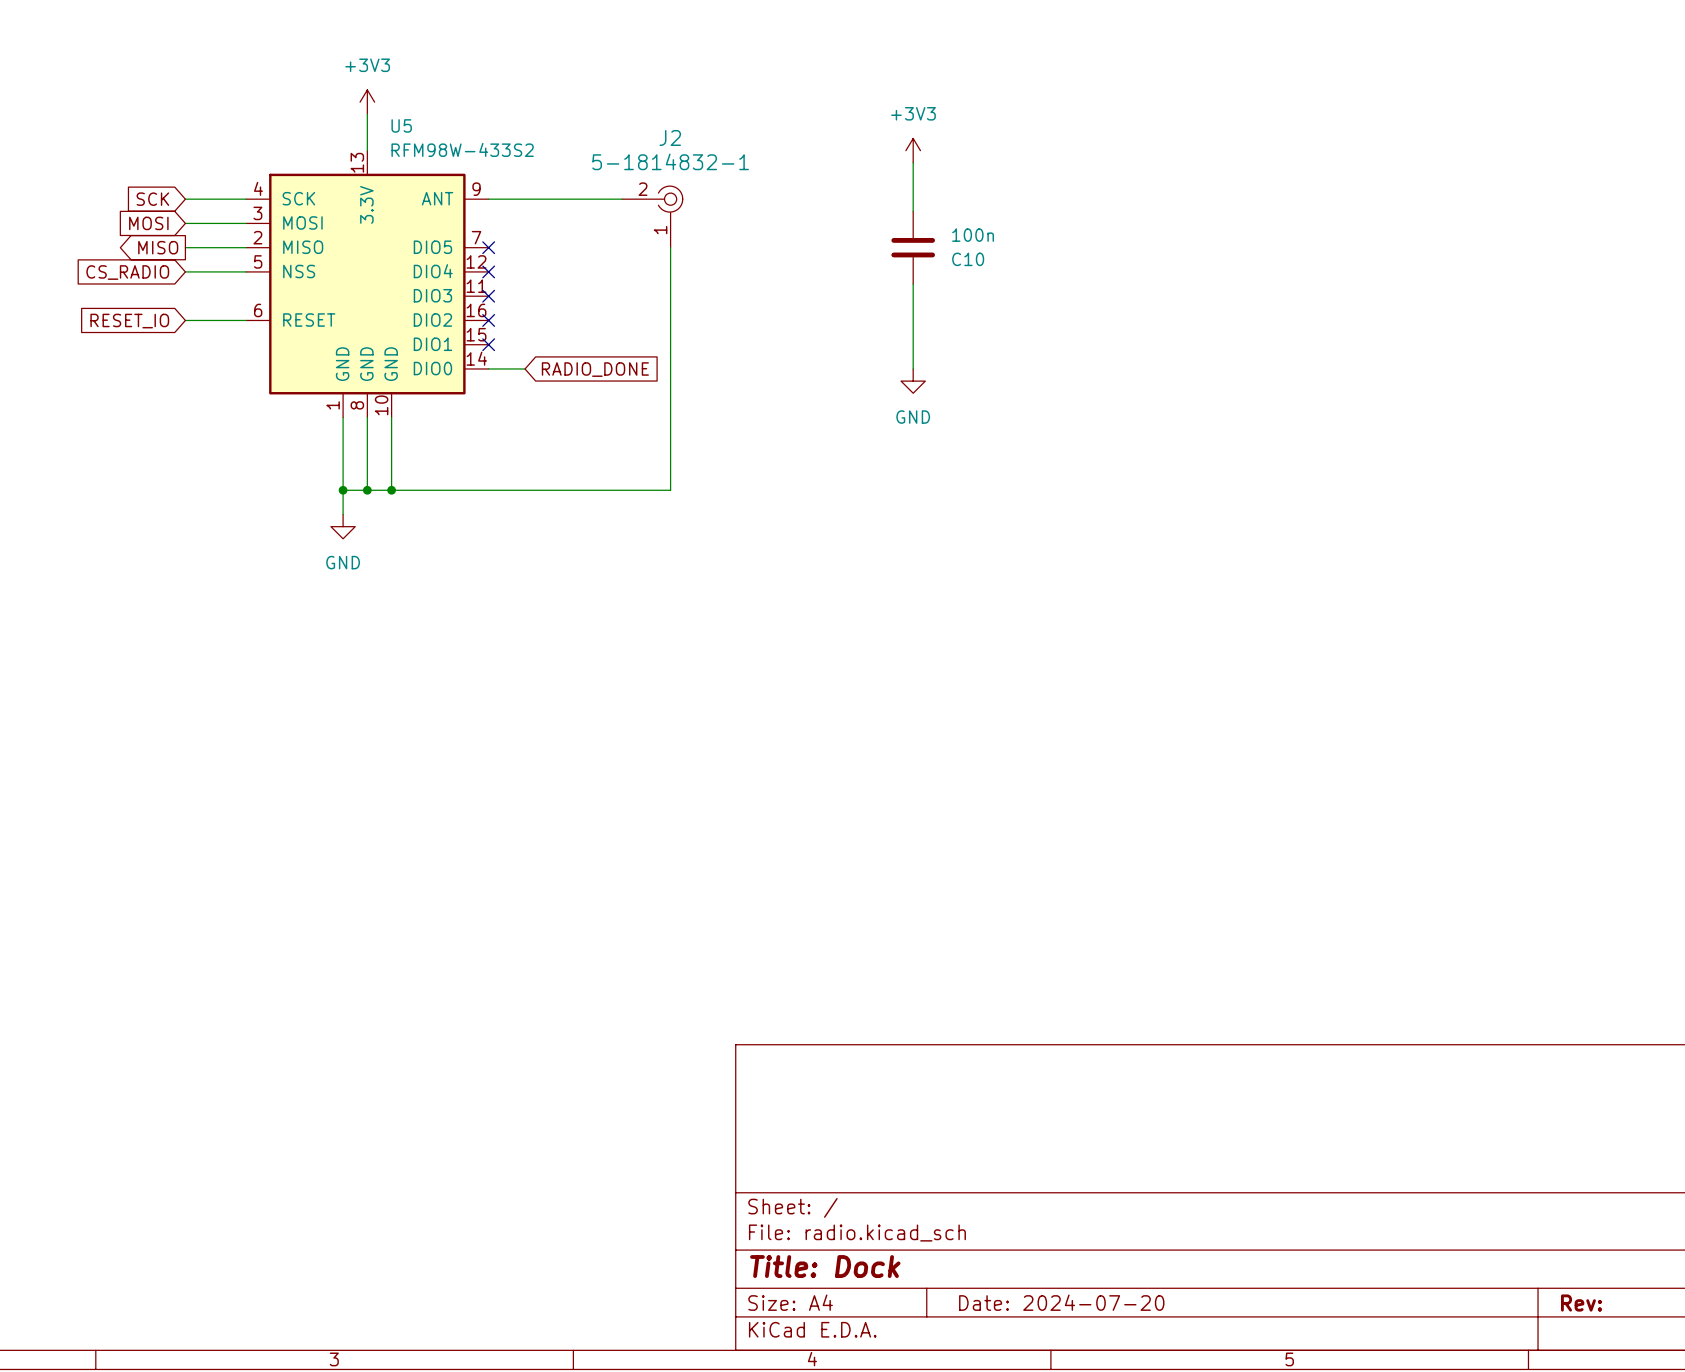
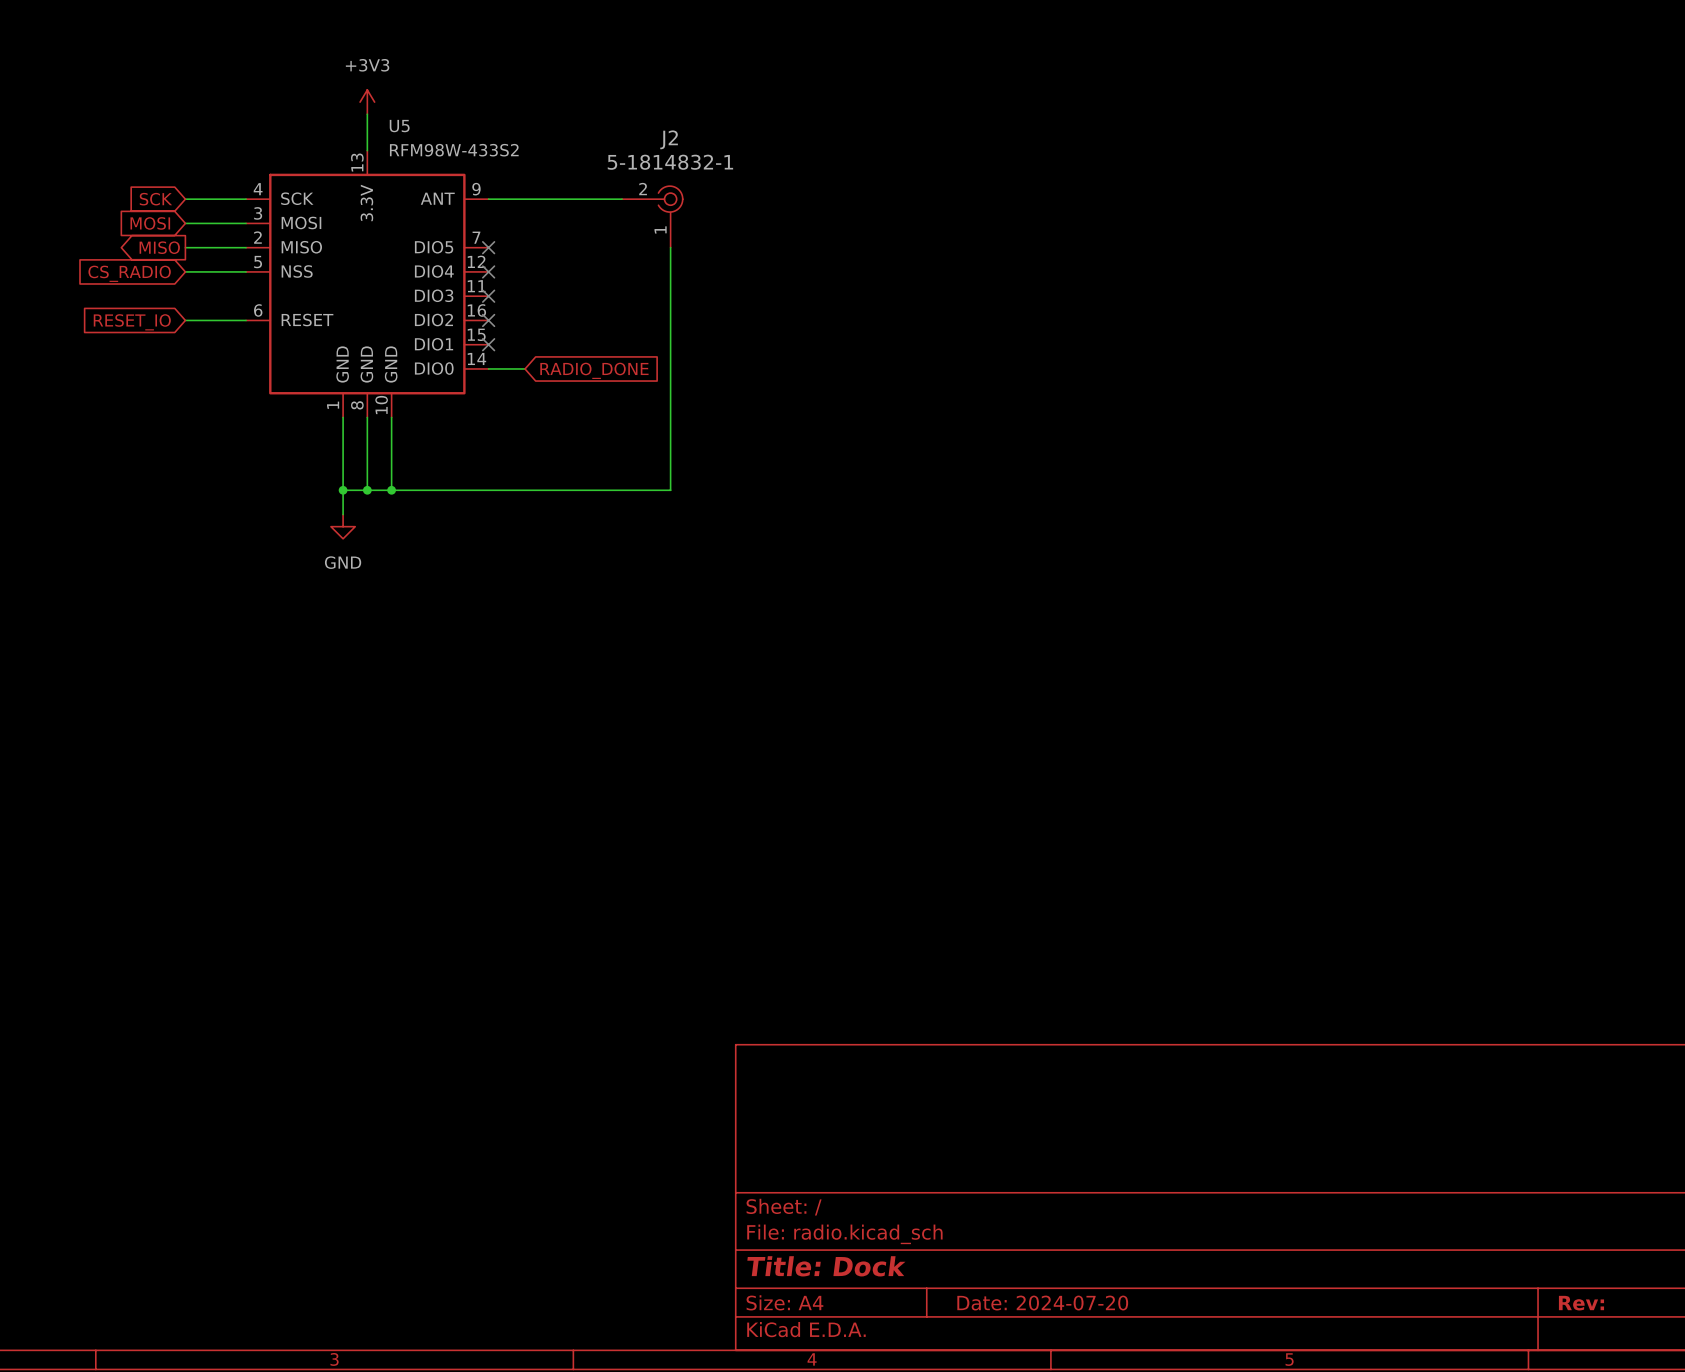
power symbol: +3V3 (913, 150) -> none
wire: (913, 162) (913, 211) -> none
C10: 100n (913, 247) -> none
wire: (913, 284) (913, 368) -> none
power symbol: GND (913, 381) -> none

